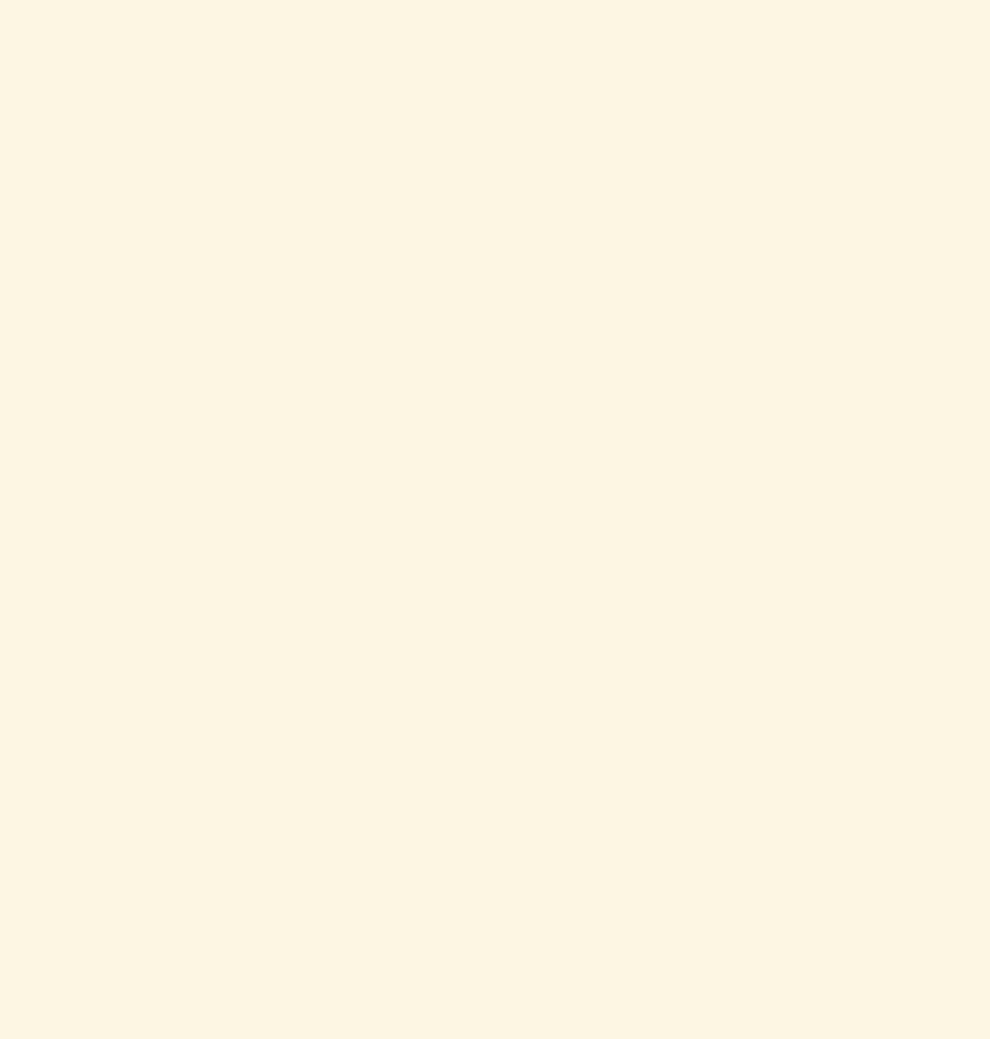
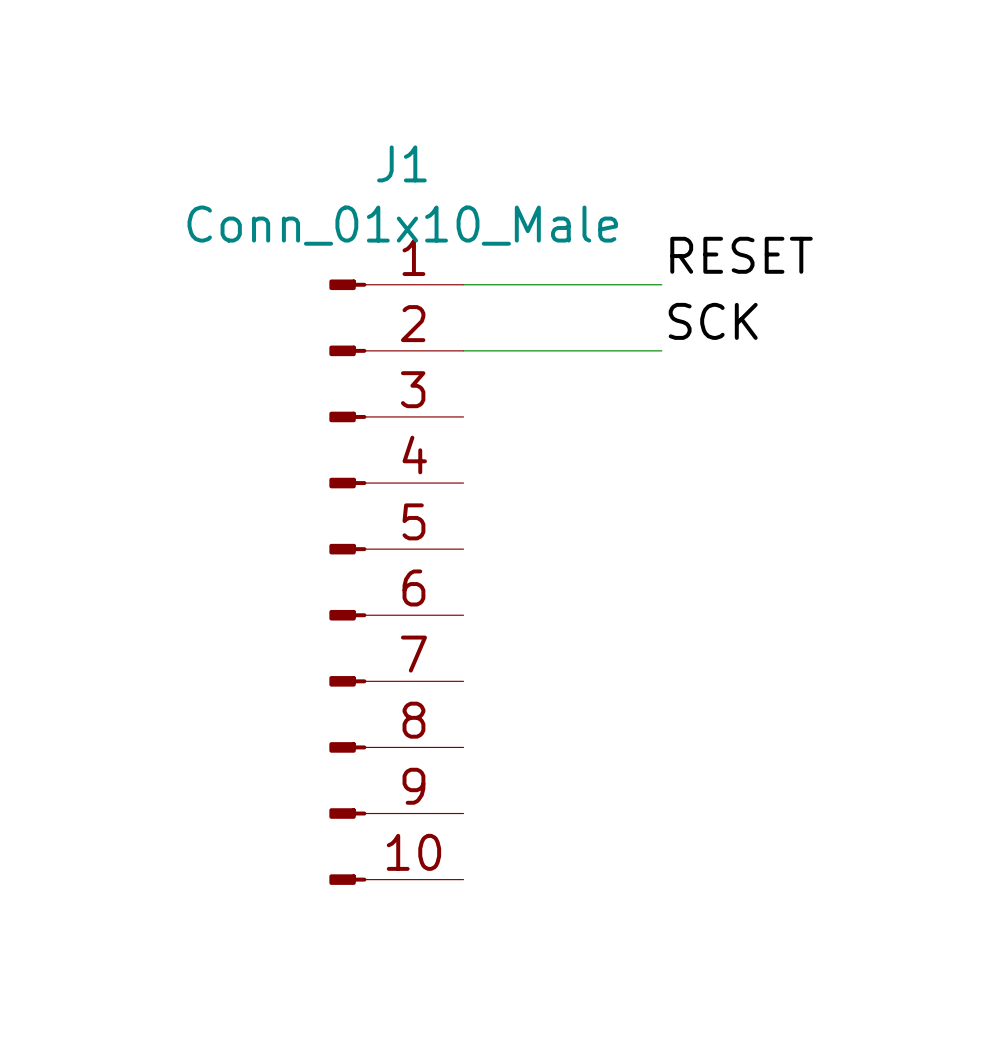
label: none -> RESET (741, 255)
wire: none -> (463, 284) (661, 284)
label: none -> SCK (713, 321)
wire: none -> (463, 350) (661, 350)
J1: none -> Conn_01x10_Male (396, 582)

